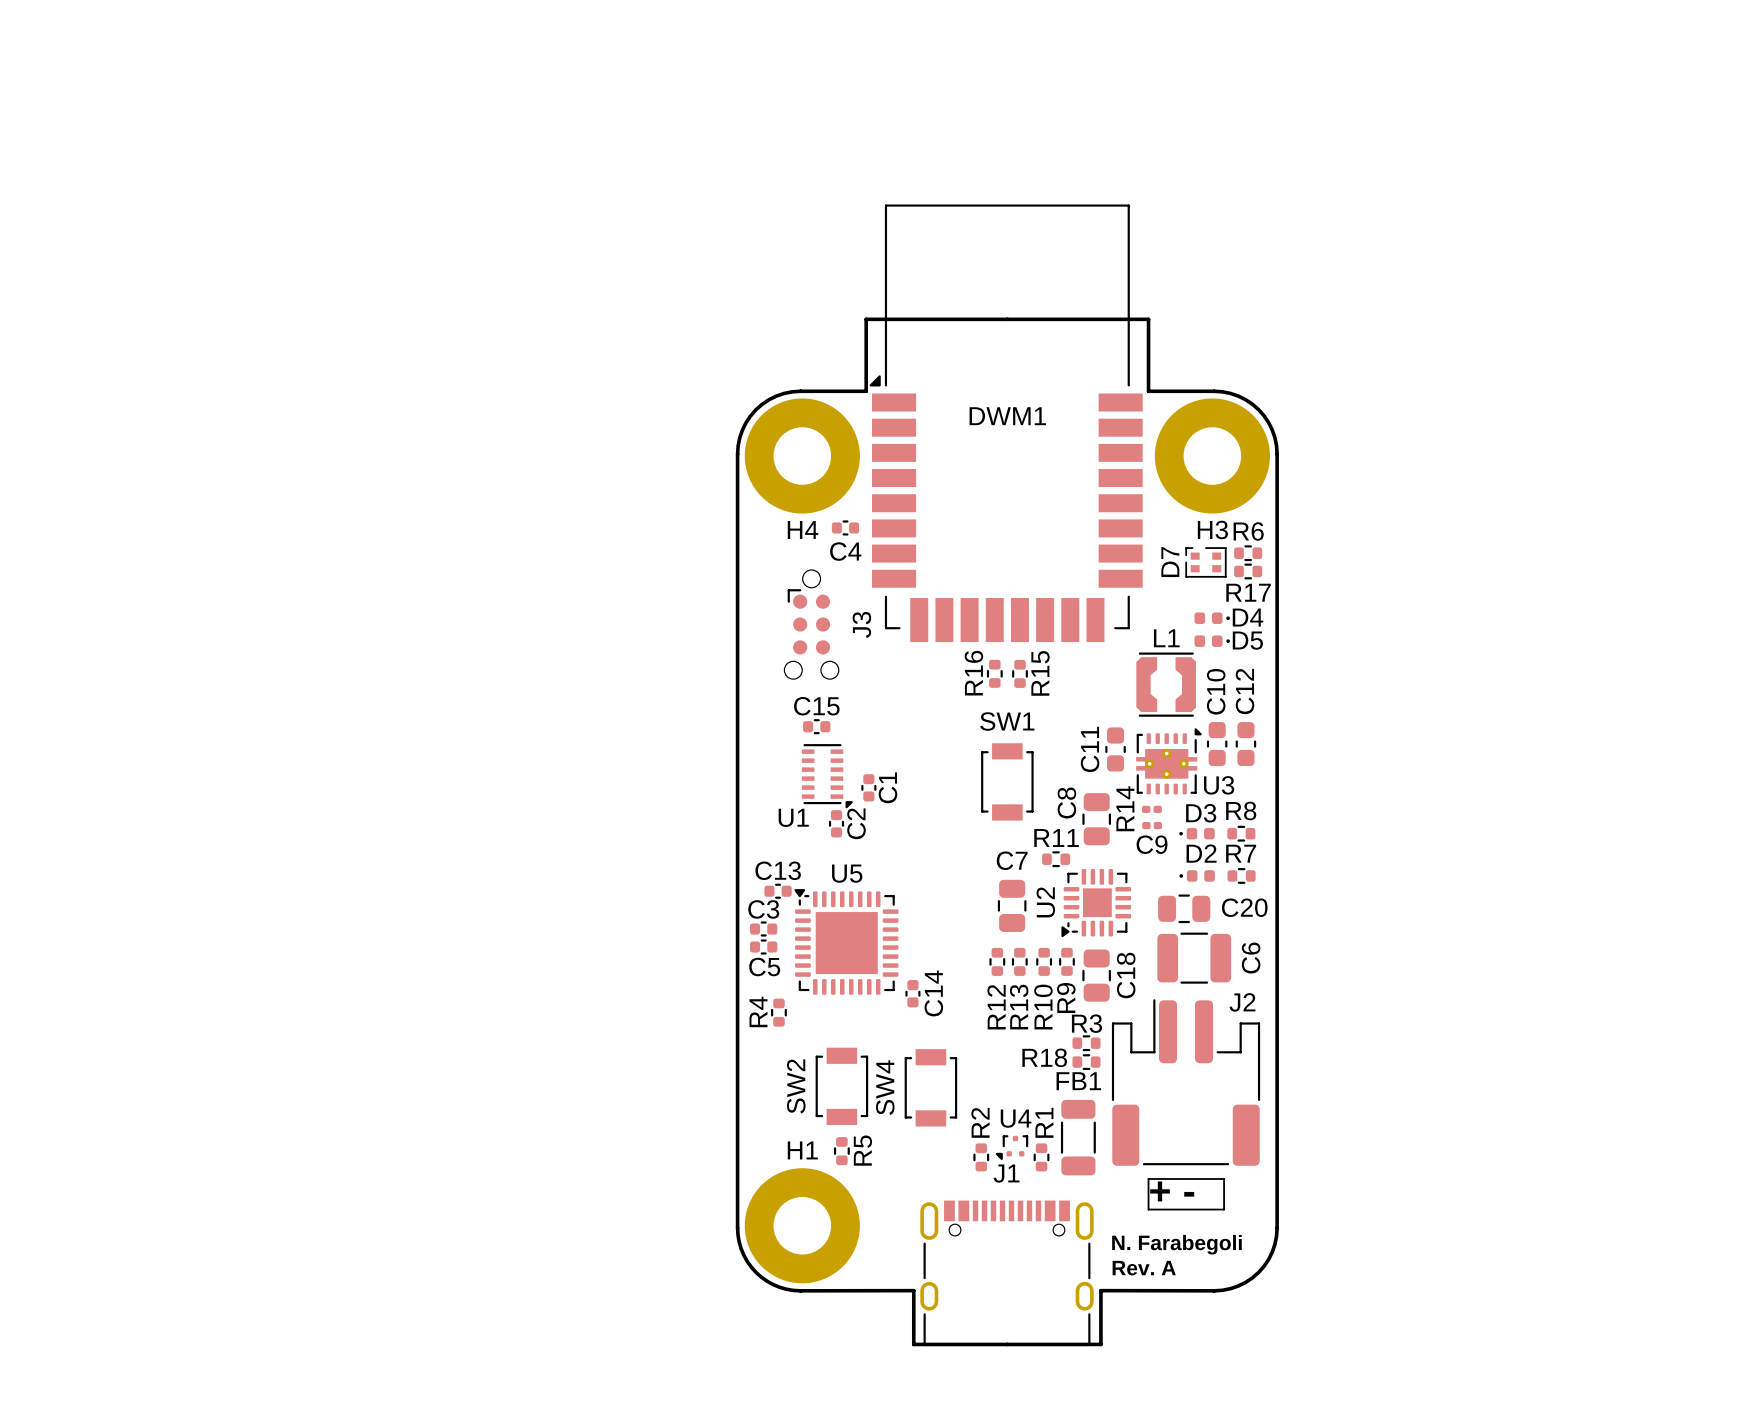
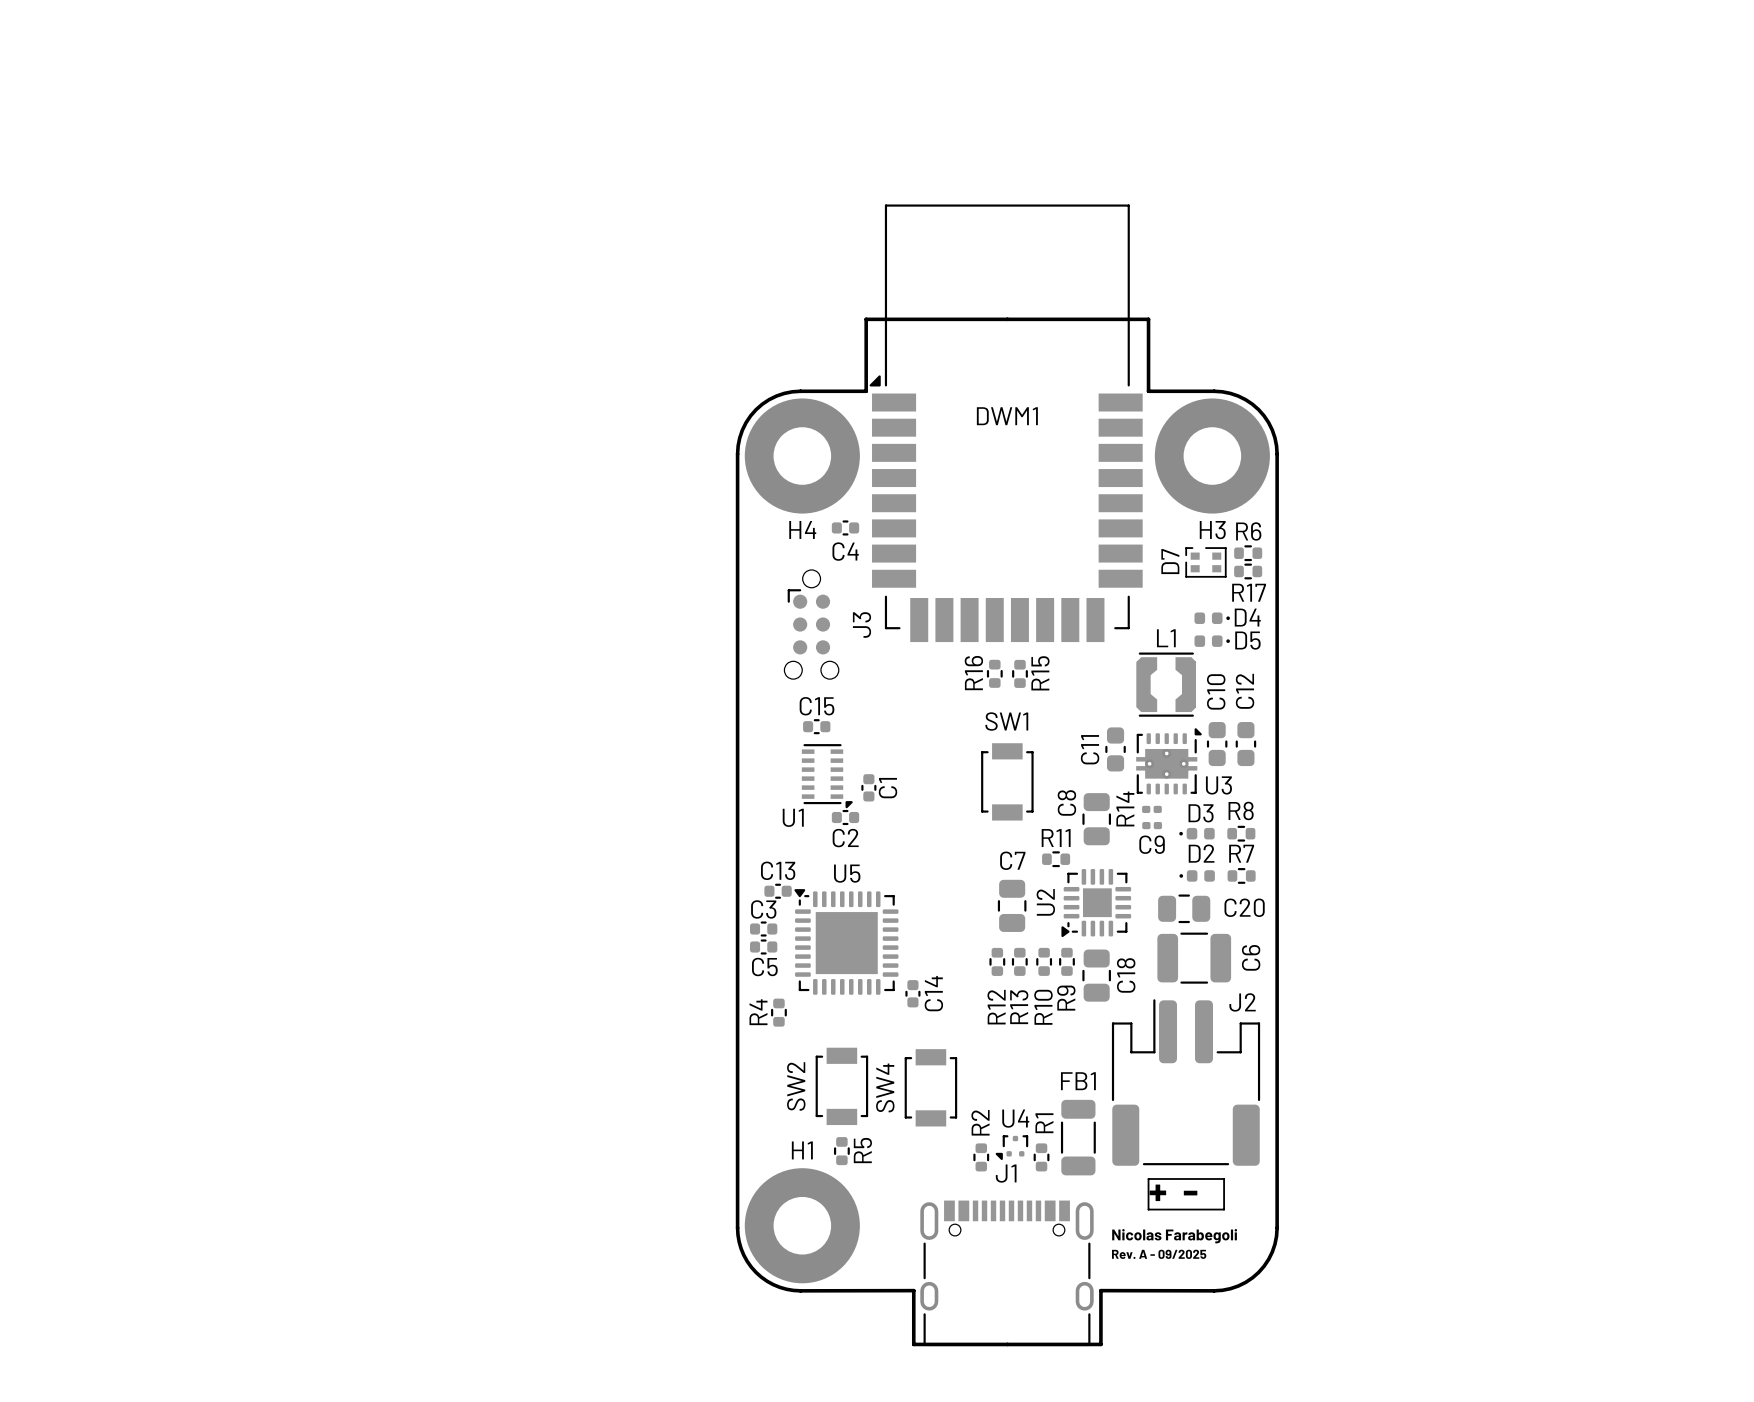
C2 rotation: 0° (836, 823) -> 90° clockwise (845, 817)
R3: (1086, 1043) -> none
R18: (1086, 1062) -> none
text: N. Farabegoli (1176, 1244) -> Nicolas Farabegoli (1174, 1236)
text: none -> Rev. A - 09/2025 (1159, 1254)
text: Rev. A (1144, 1268) -> none

